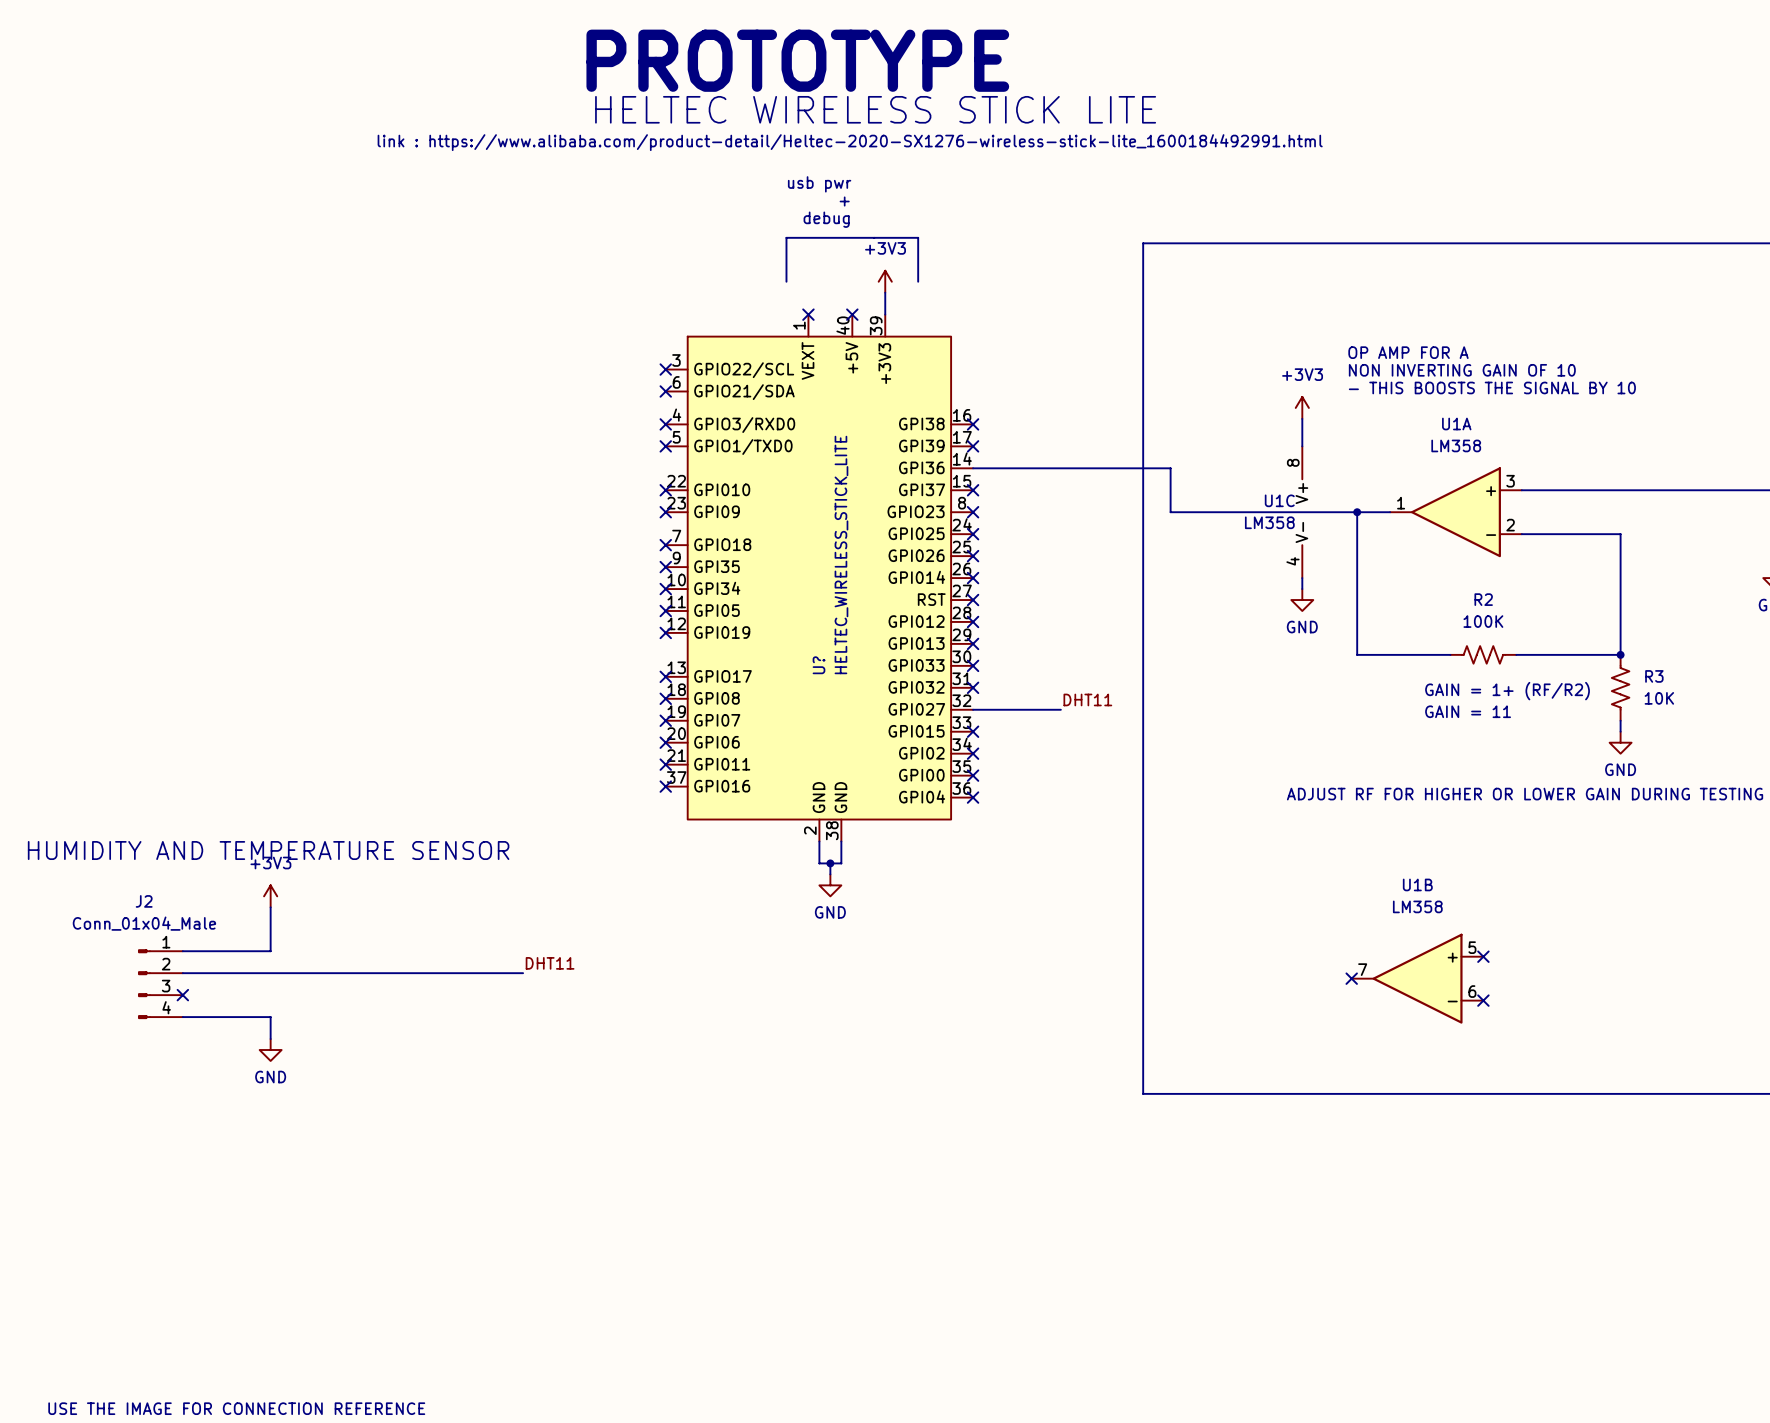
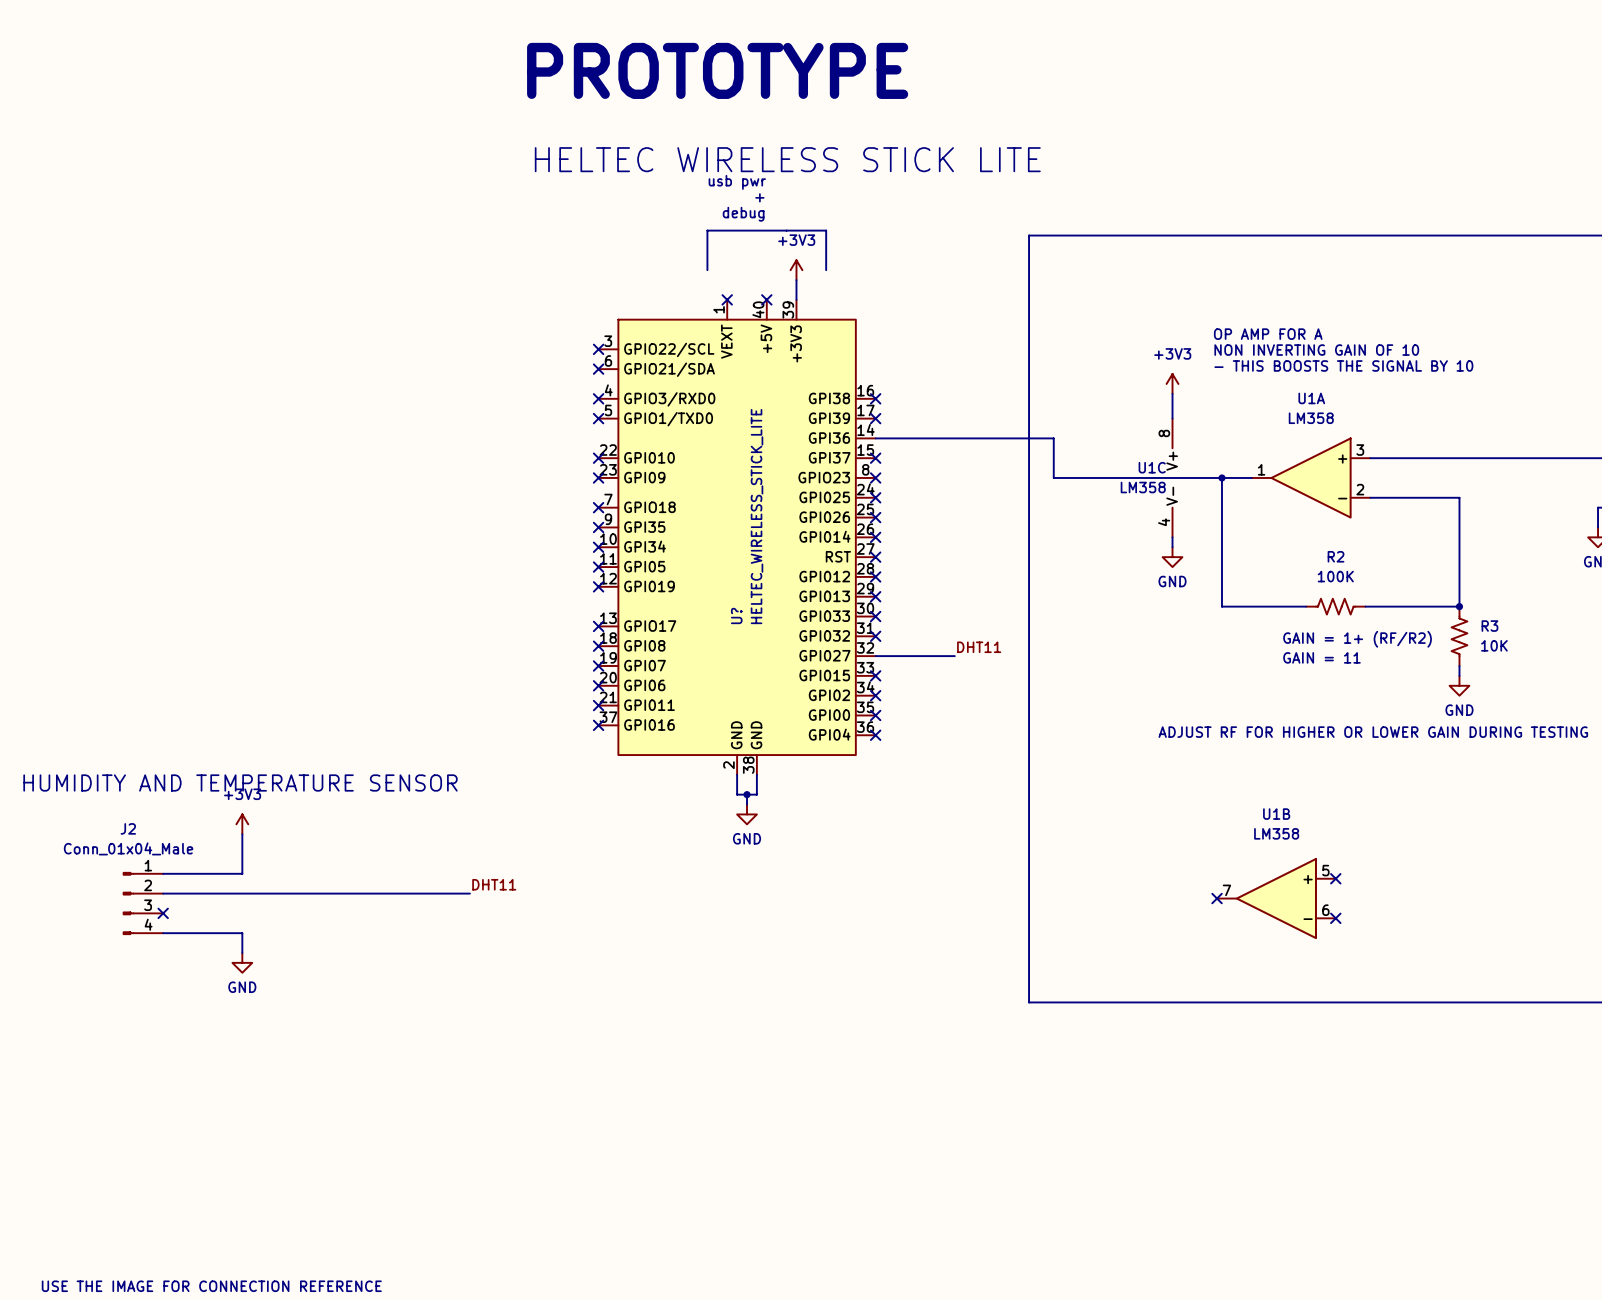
text position: HELTEC WIRELESS STICK LITE (875, 109) -> HELTEC WIRELESS STICK LITE (787, 159)
text: link : https://www.alibaba.com/product-detail/Heltec-2020-SX1276-wireless-stick-lite_1600184492991.html (850, 142) -> none

